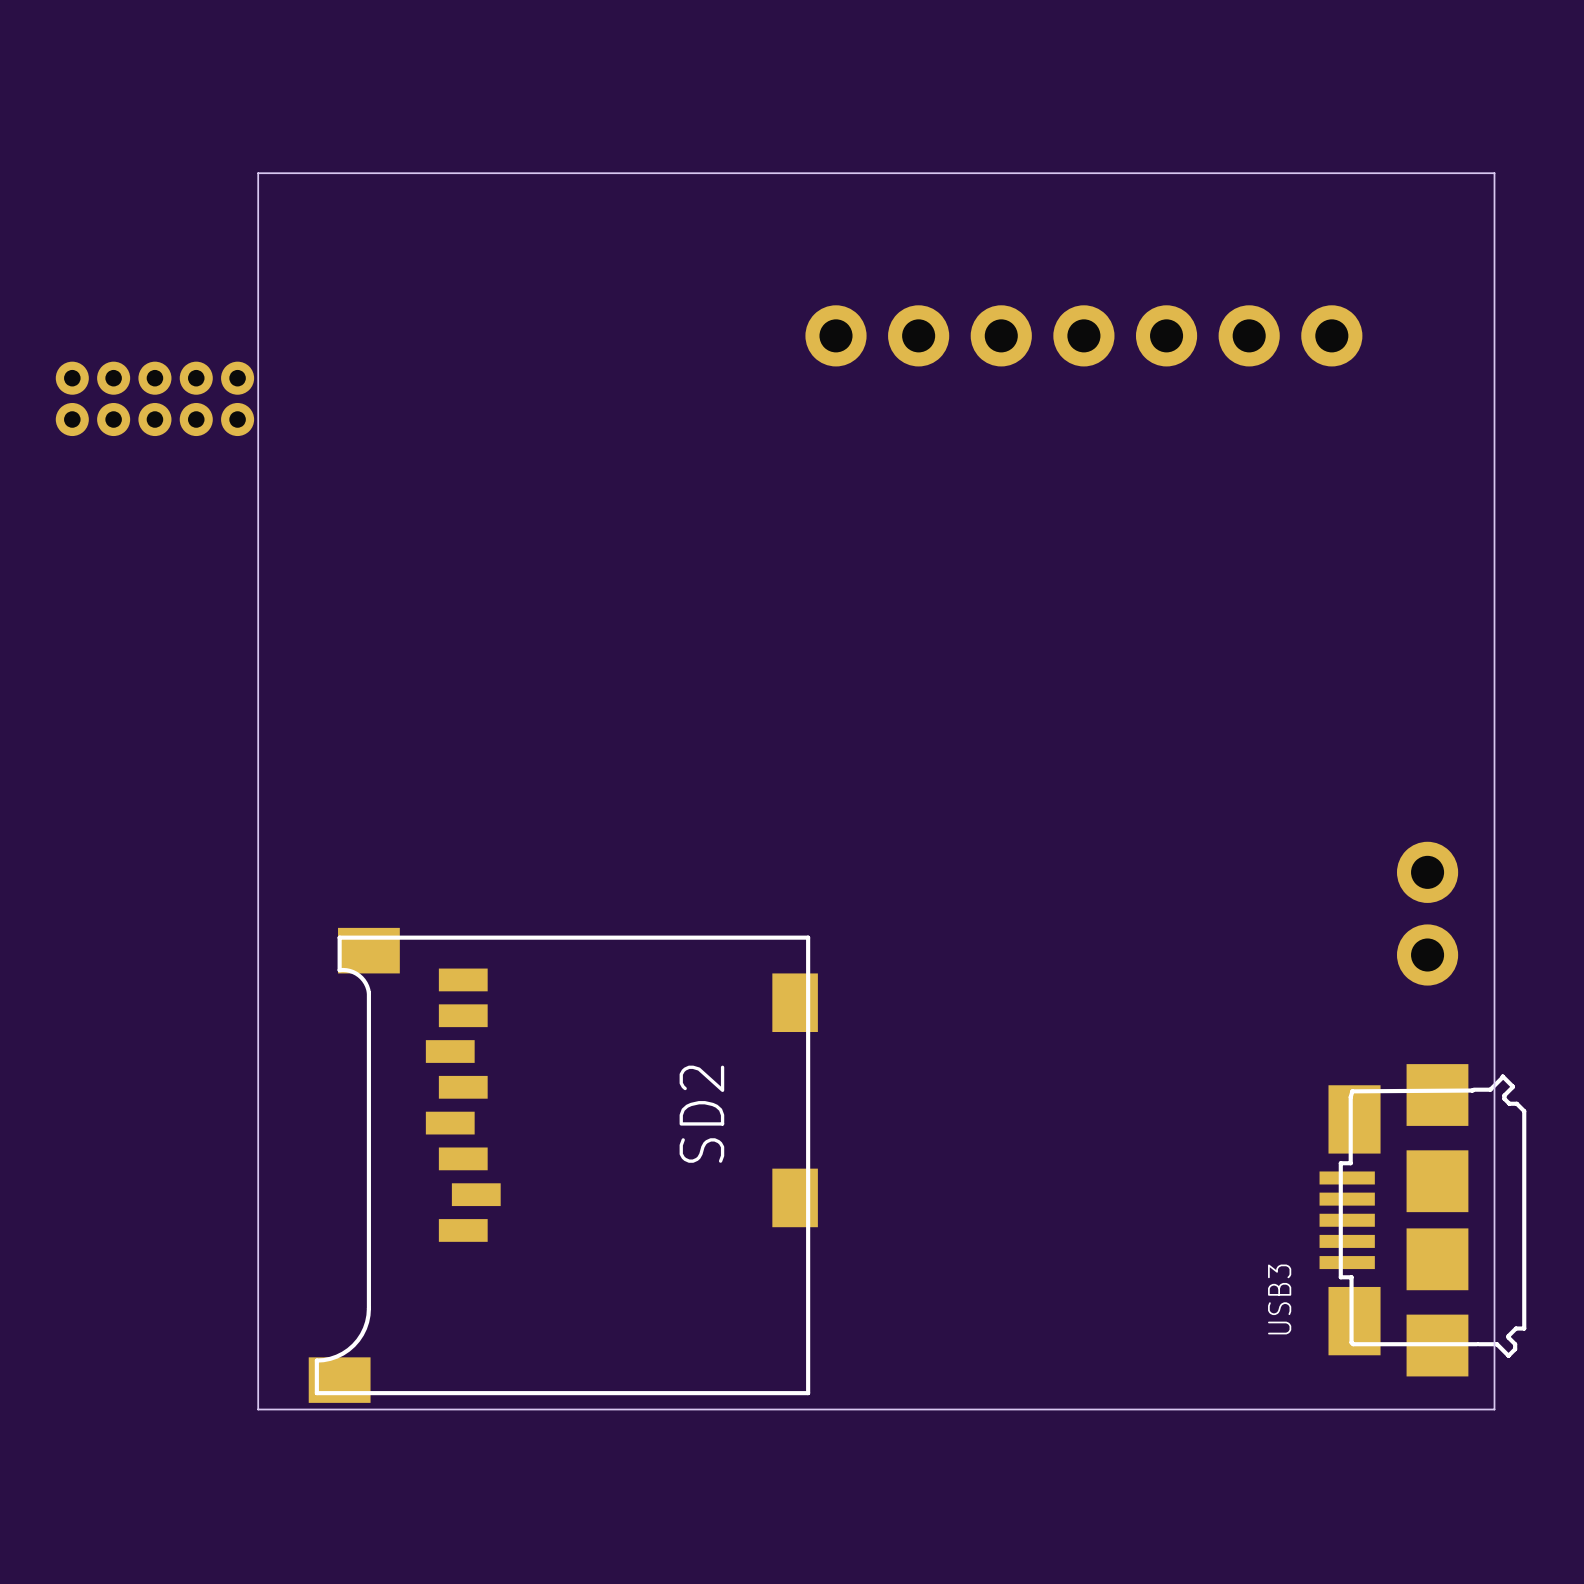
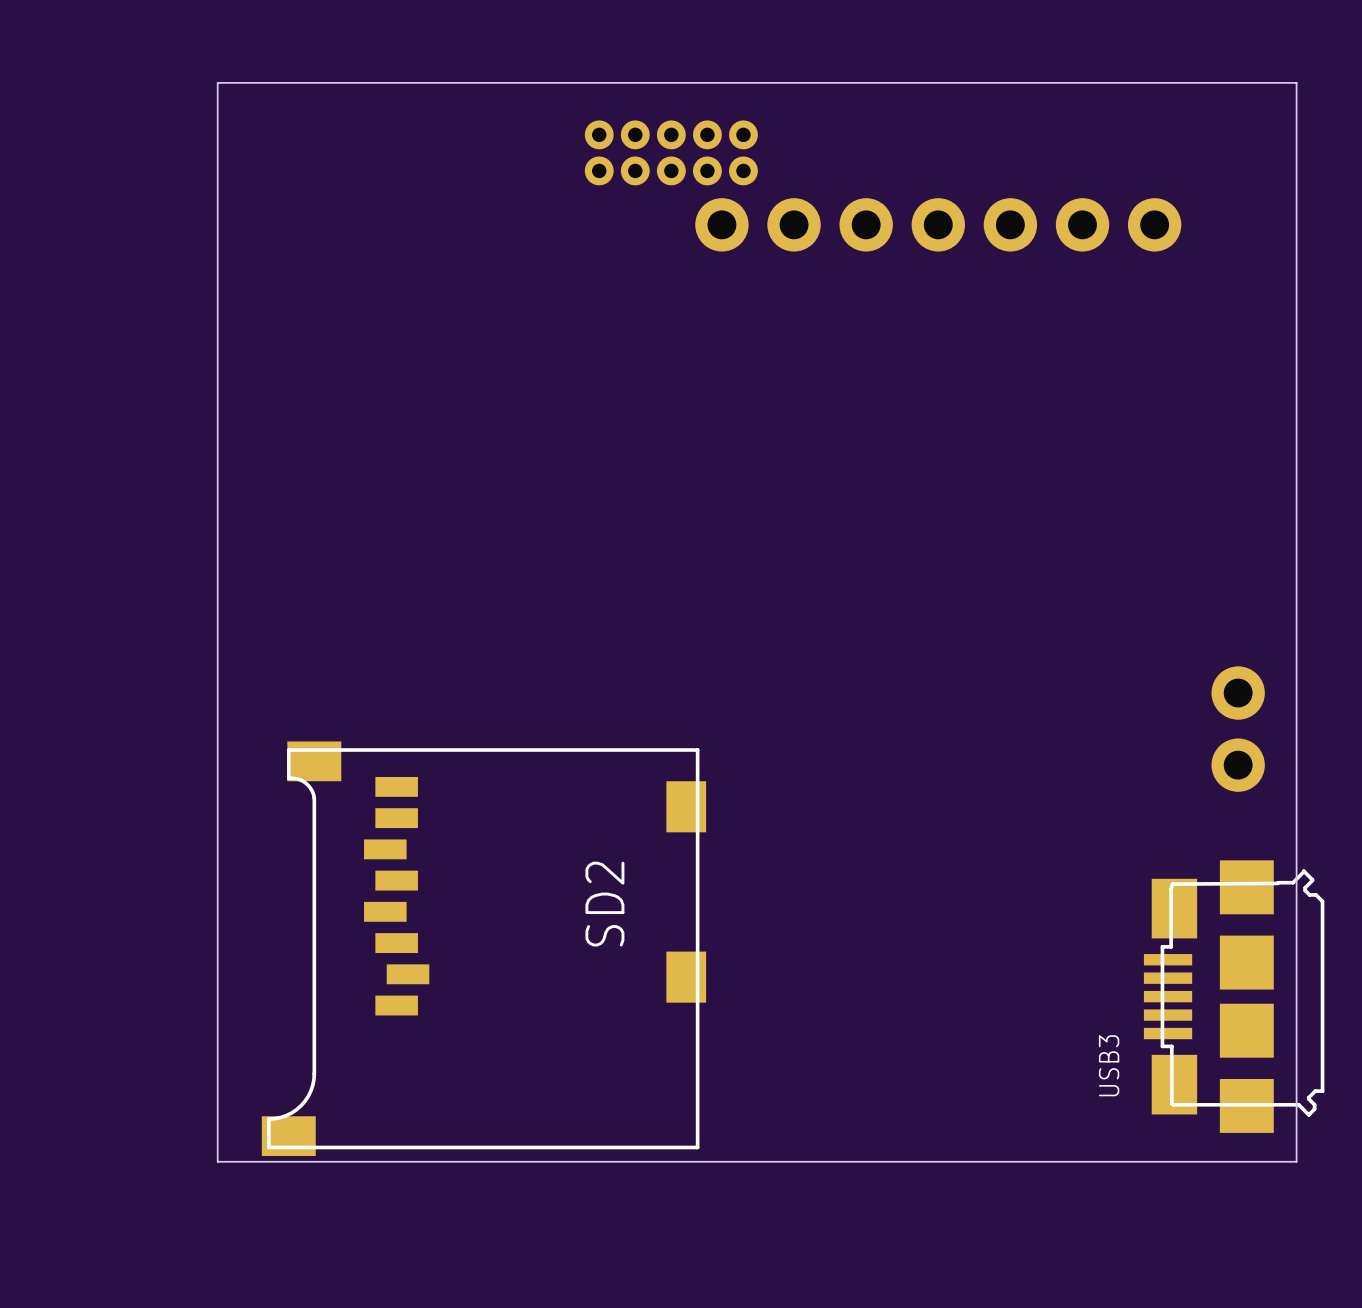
part position: (154, 398) -> (671, 152)

